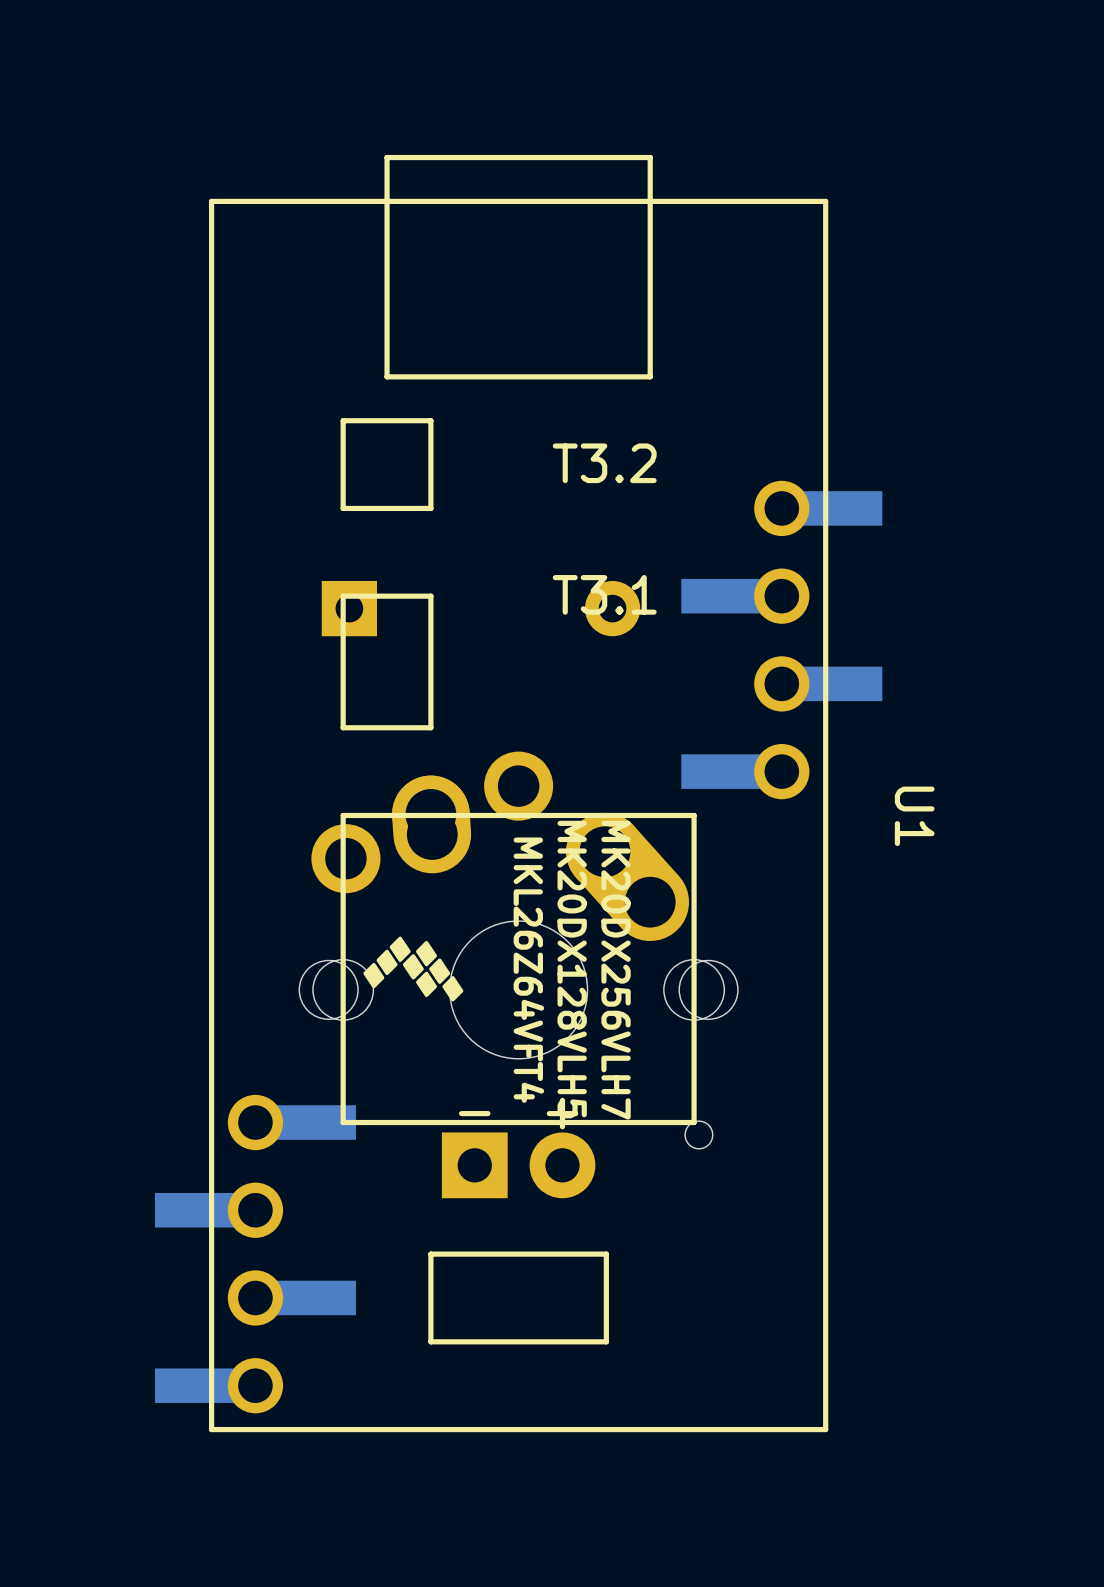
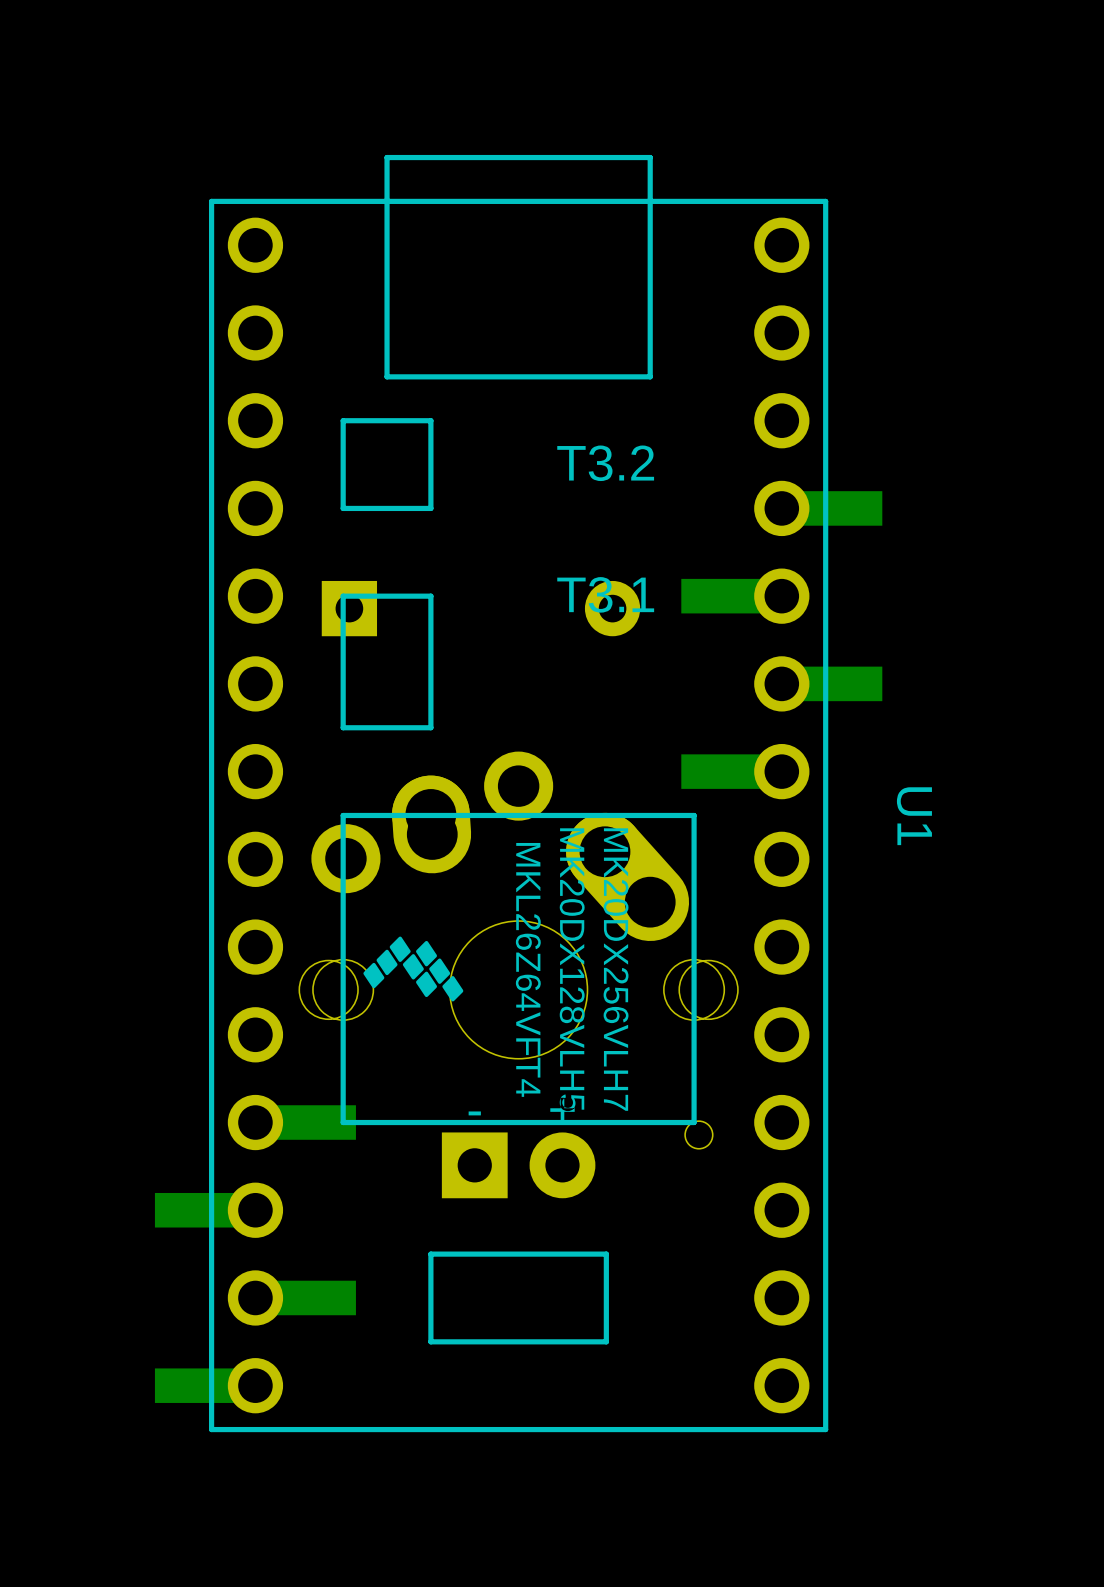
U1 footprint: [154, 154, 883, 1433] -> [154, 154, 883, 1433]

